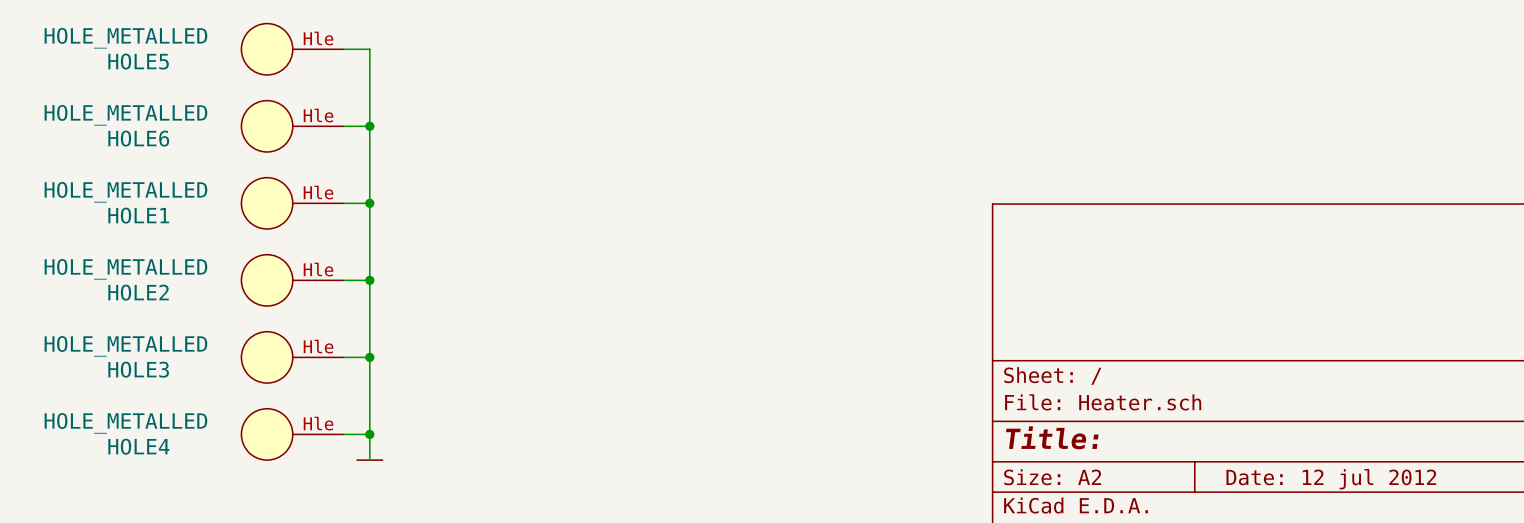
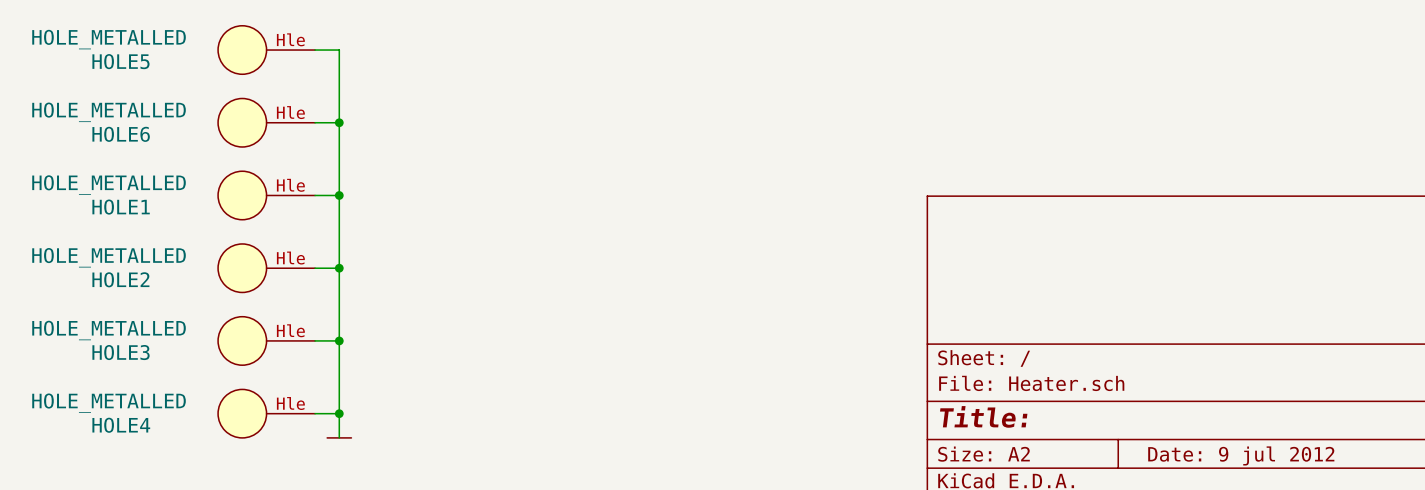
title block: Date: 12 jul 2012 (1331, 479) -> Date: 9 jul 2012 (1241, 455)

